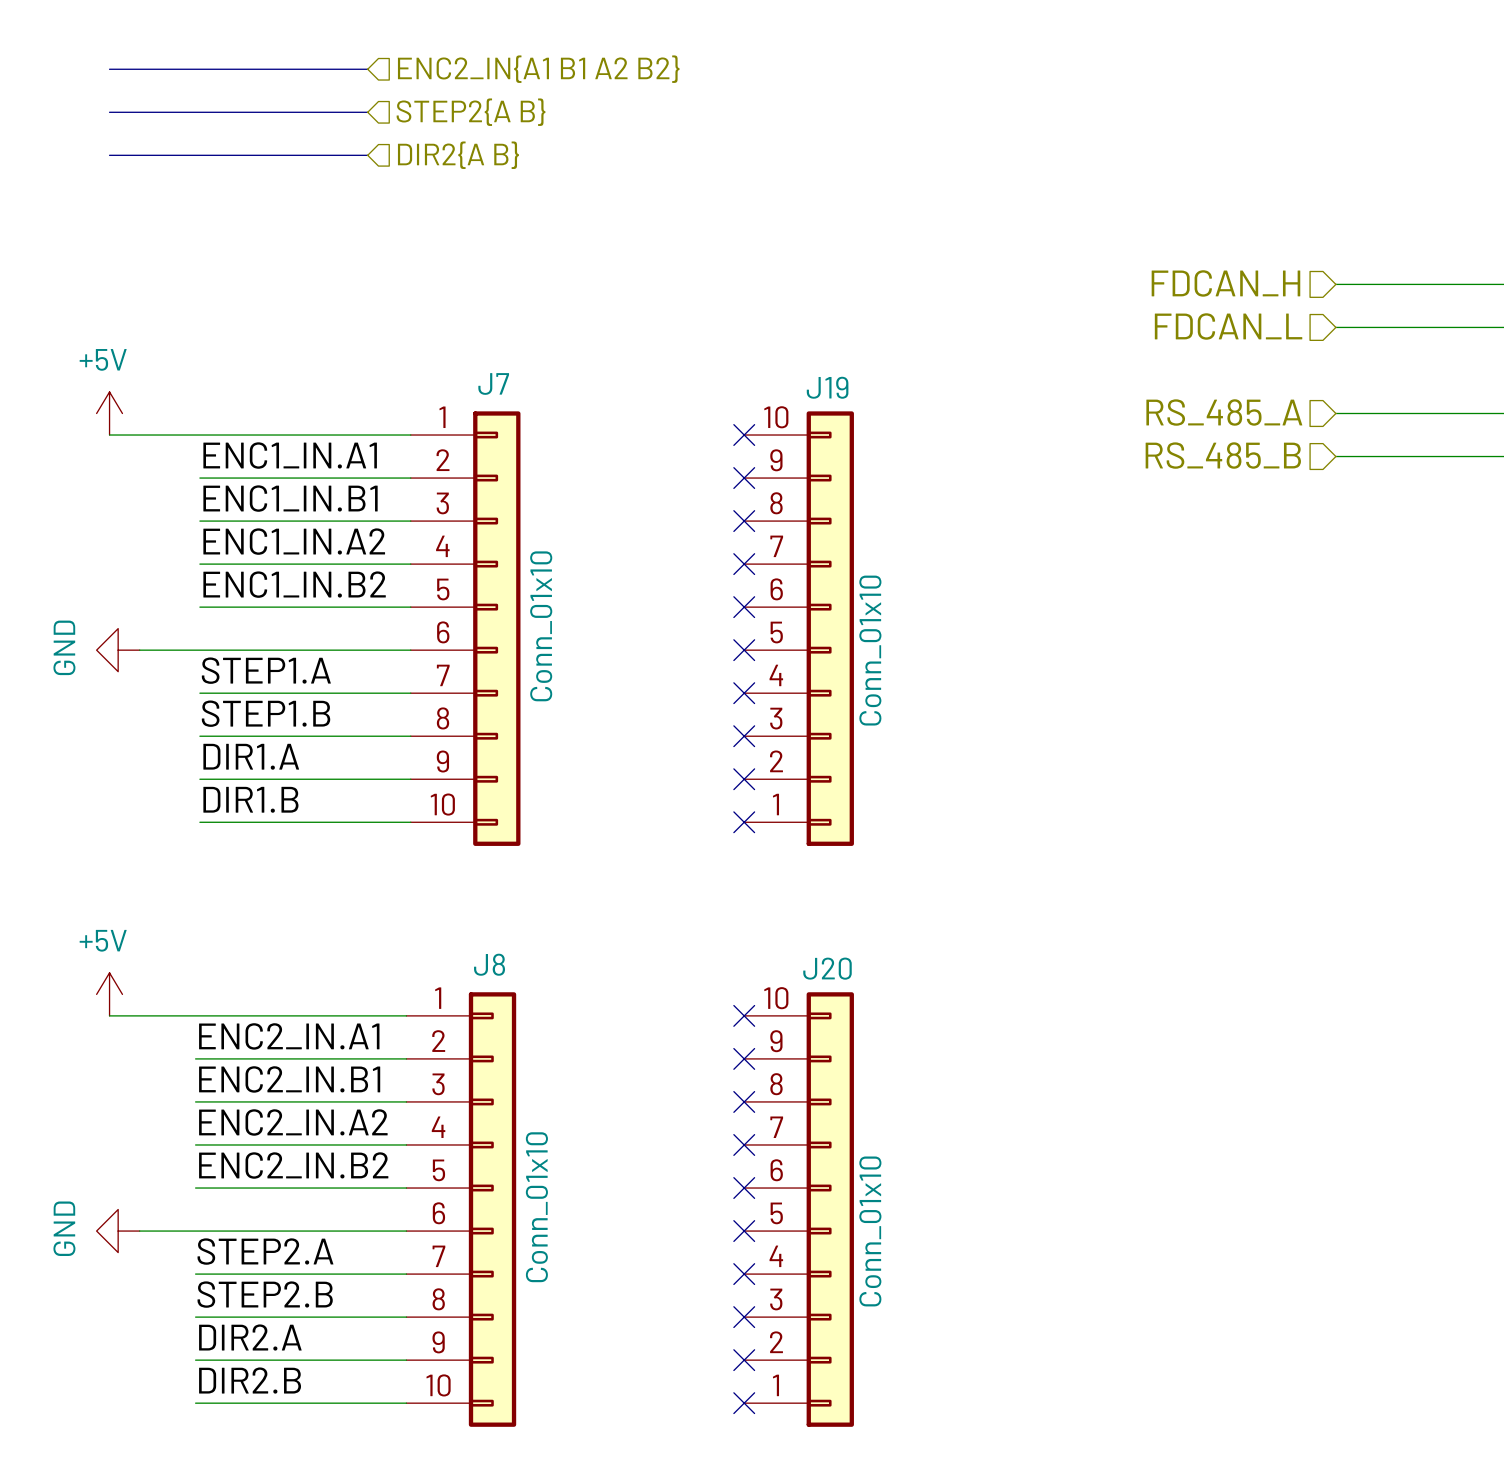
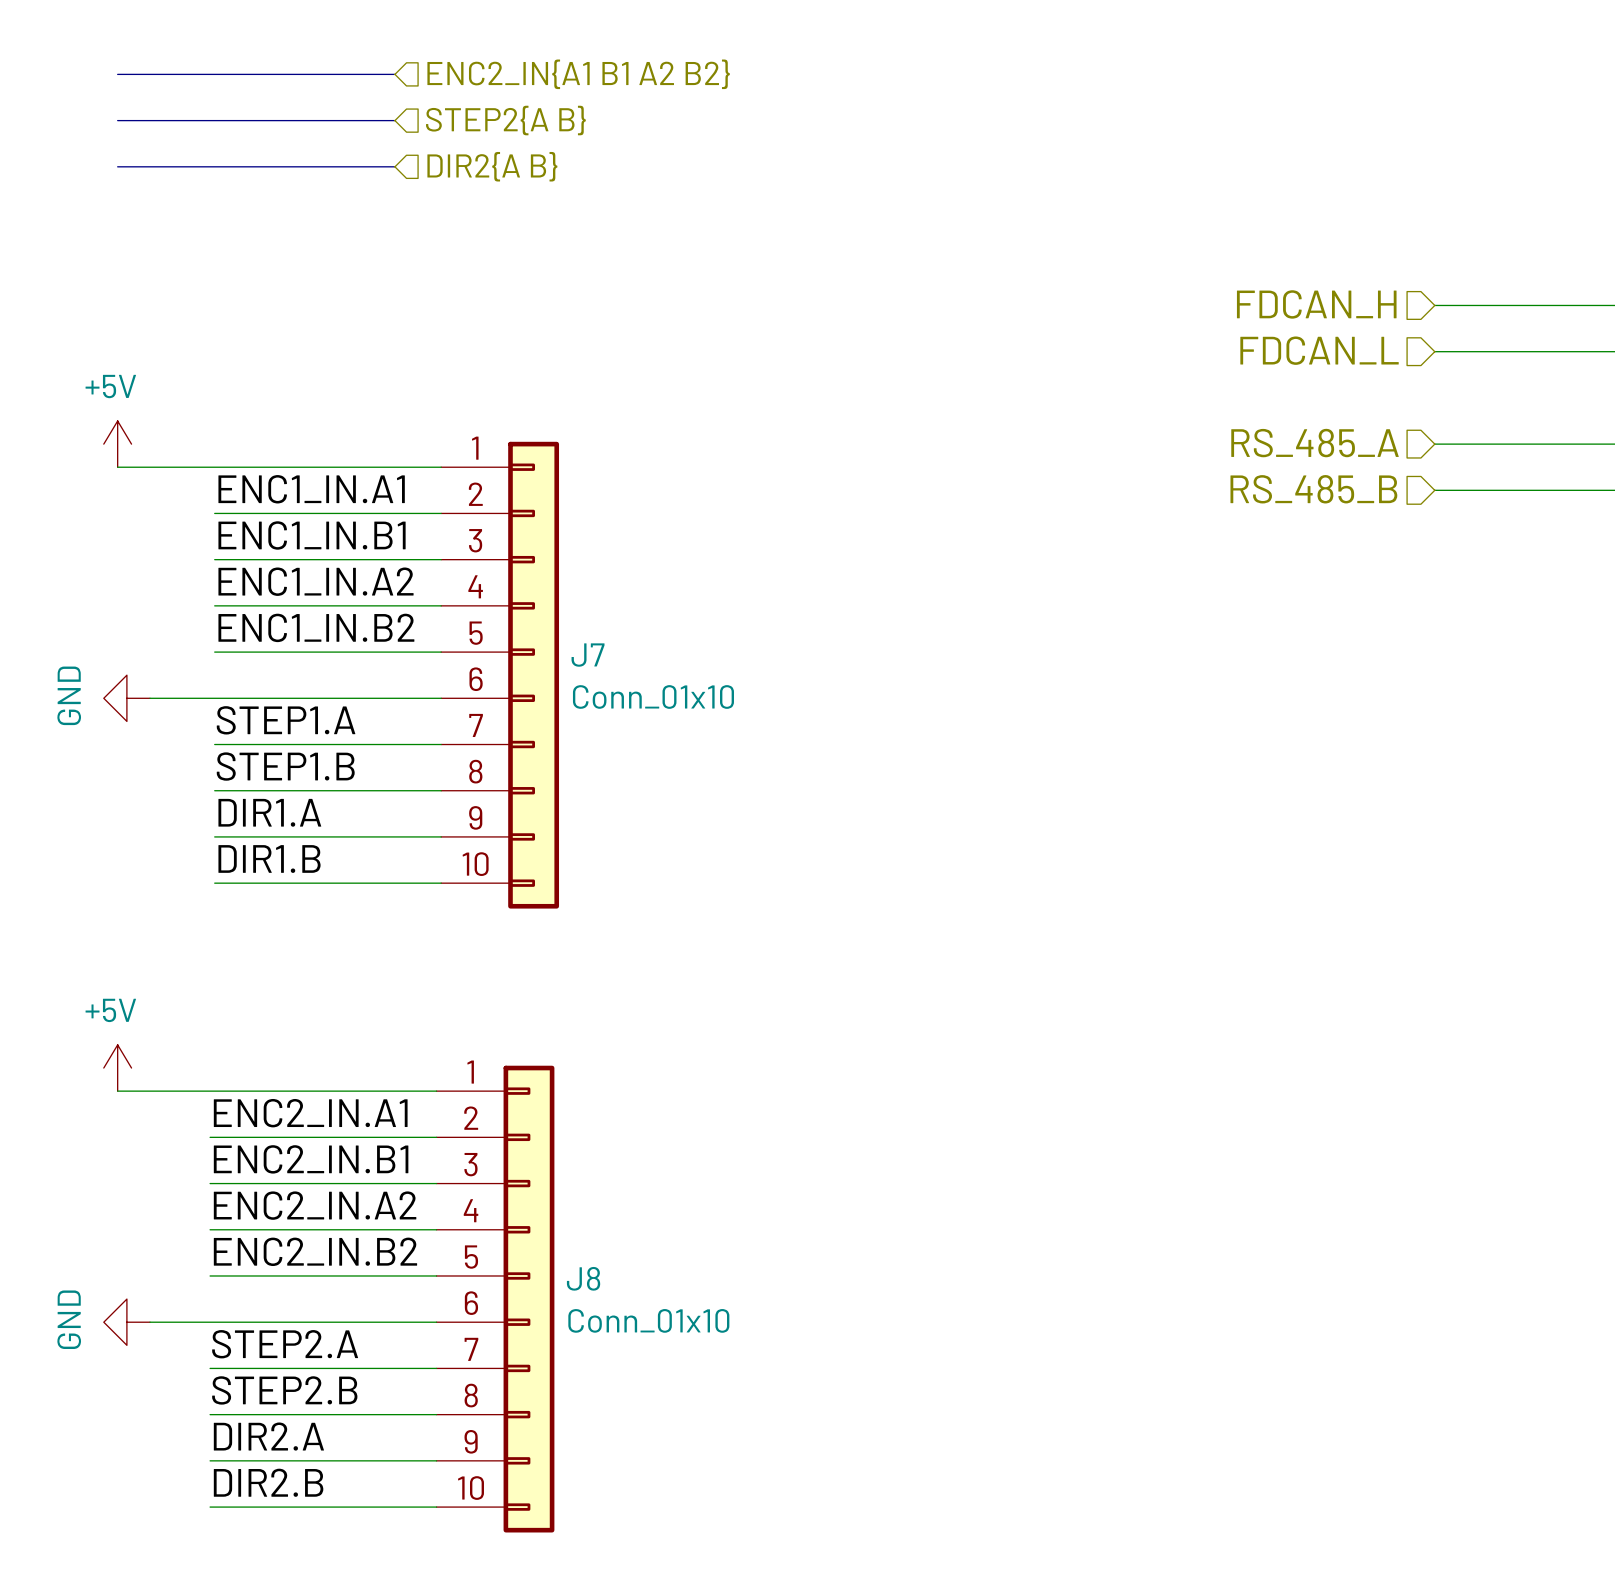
J7 name position: J7 (493, 383) -> J7 (588, 655)
no-connect mark: (744, 435) -> none
no-connect mark: (744, 478) -> none
no-connect mark: (744, 521) -> none
no-connect mark: (744, 564) -> none
no-connect mark: (744, 607) -> none
J7 value rotation: 0° (541, 626) -> 90° clockwise (653, 696)
J19: Conn_01x10 (799, 628) -> none
no-connect mark: (744, 650) -> none
no-connect mark: (744, 693) -> none
no-connect mark: (744, 736) -> none
no-connect mark: (744, 779) -> none
no-connect mark: (744, 822) -> none
J8 name position: J8 (489, 964) -> J8 (583, 1278)
no-connect mark: (744, 1015) -> none
no-connect mark: (744, 1058) -> none
no-connect mark: (744, 1101) -> none
no-connect mark: (744, 1144) -> none
no-connect mark: (744, 1188) -> none
J8 value rotation: 0° (536, 1207) -> 90° clockwise (648, 1320)
J20: Conn_01x10 (799, 1209) -> none
no-connect mark: (744, 1231) -> none
no-connect mark: (744, 1274) -> none
no-connect mark: (744, 1317) -> none
no-connect mark: (744, 1360) -> none
no-connect mark: (744, 1403) -> none

